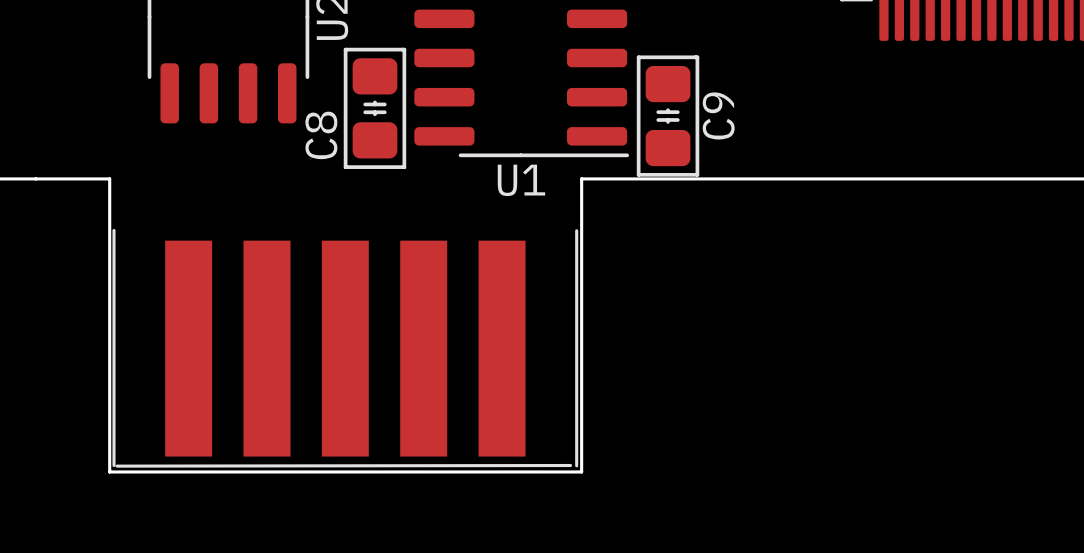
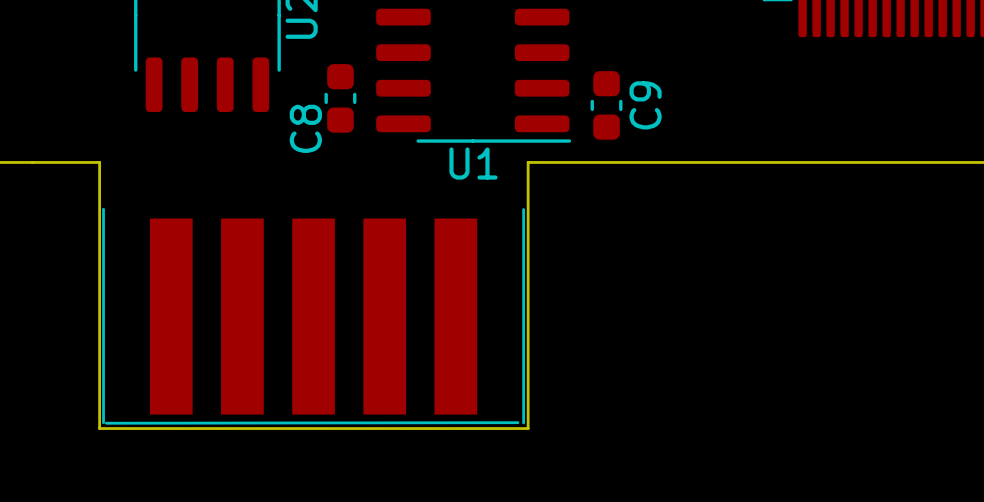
C8 footprint: [343, 47, 407, 169] -> [324, 64, 357, 133]
C9 footprint: [636, 55, 700, 177] -> [590, 71, 623, 140]

